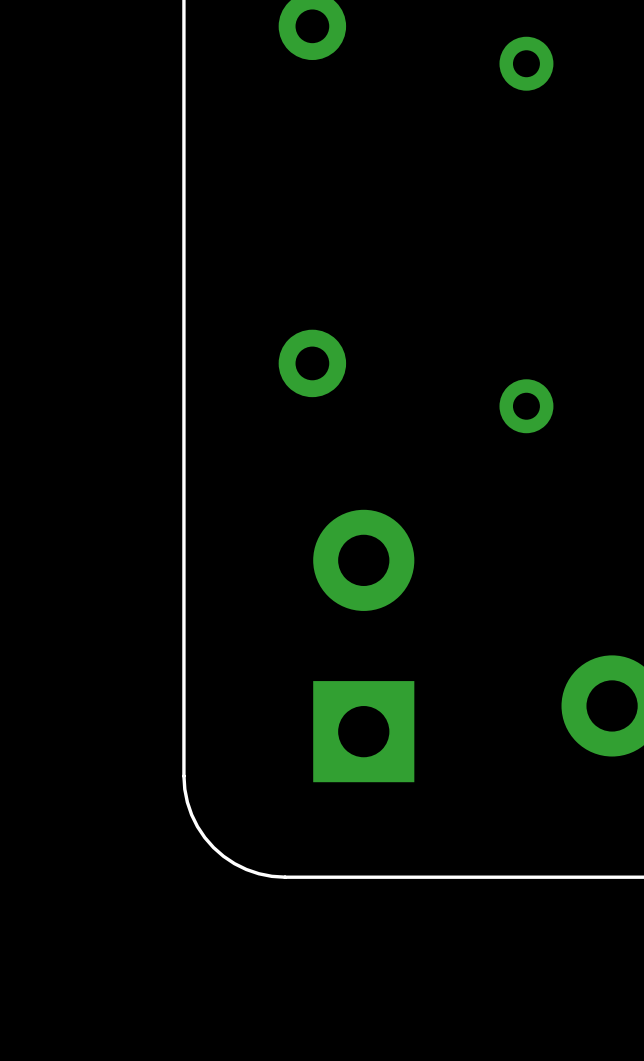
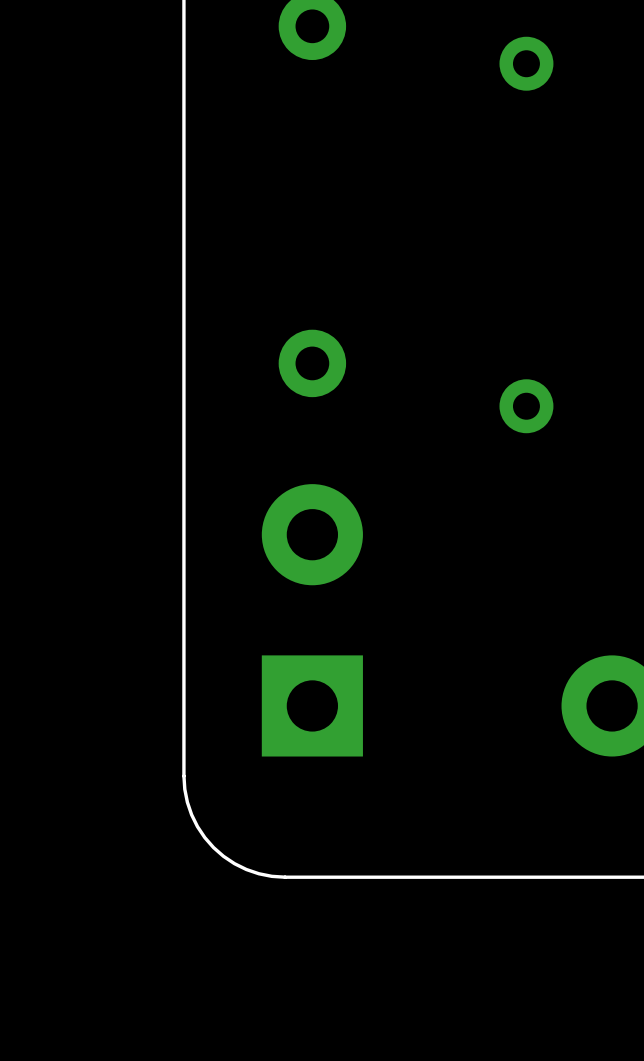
part position: (363, 646) -> (312, 620)

